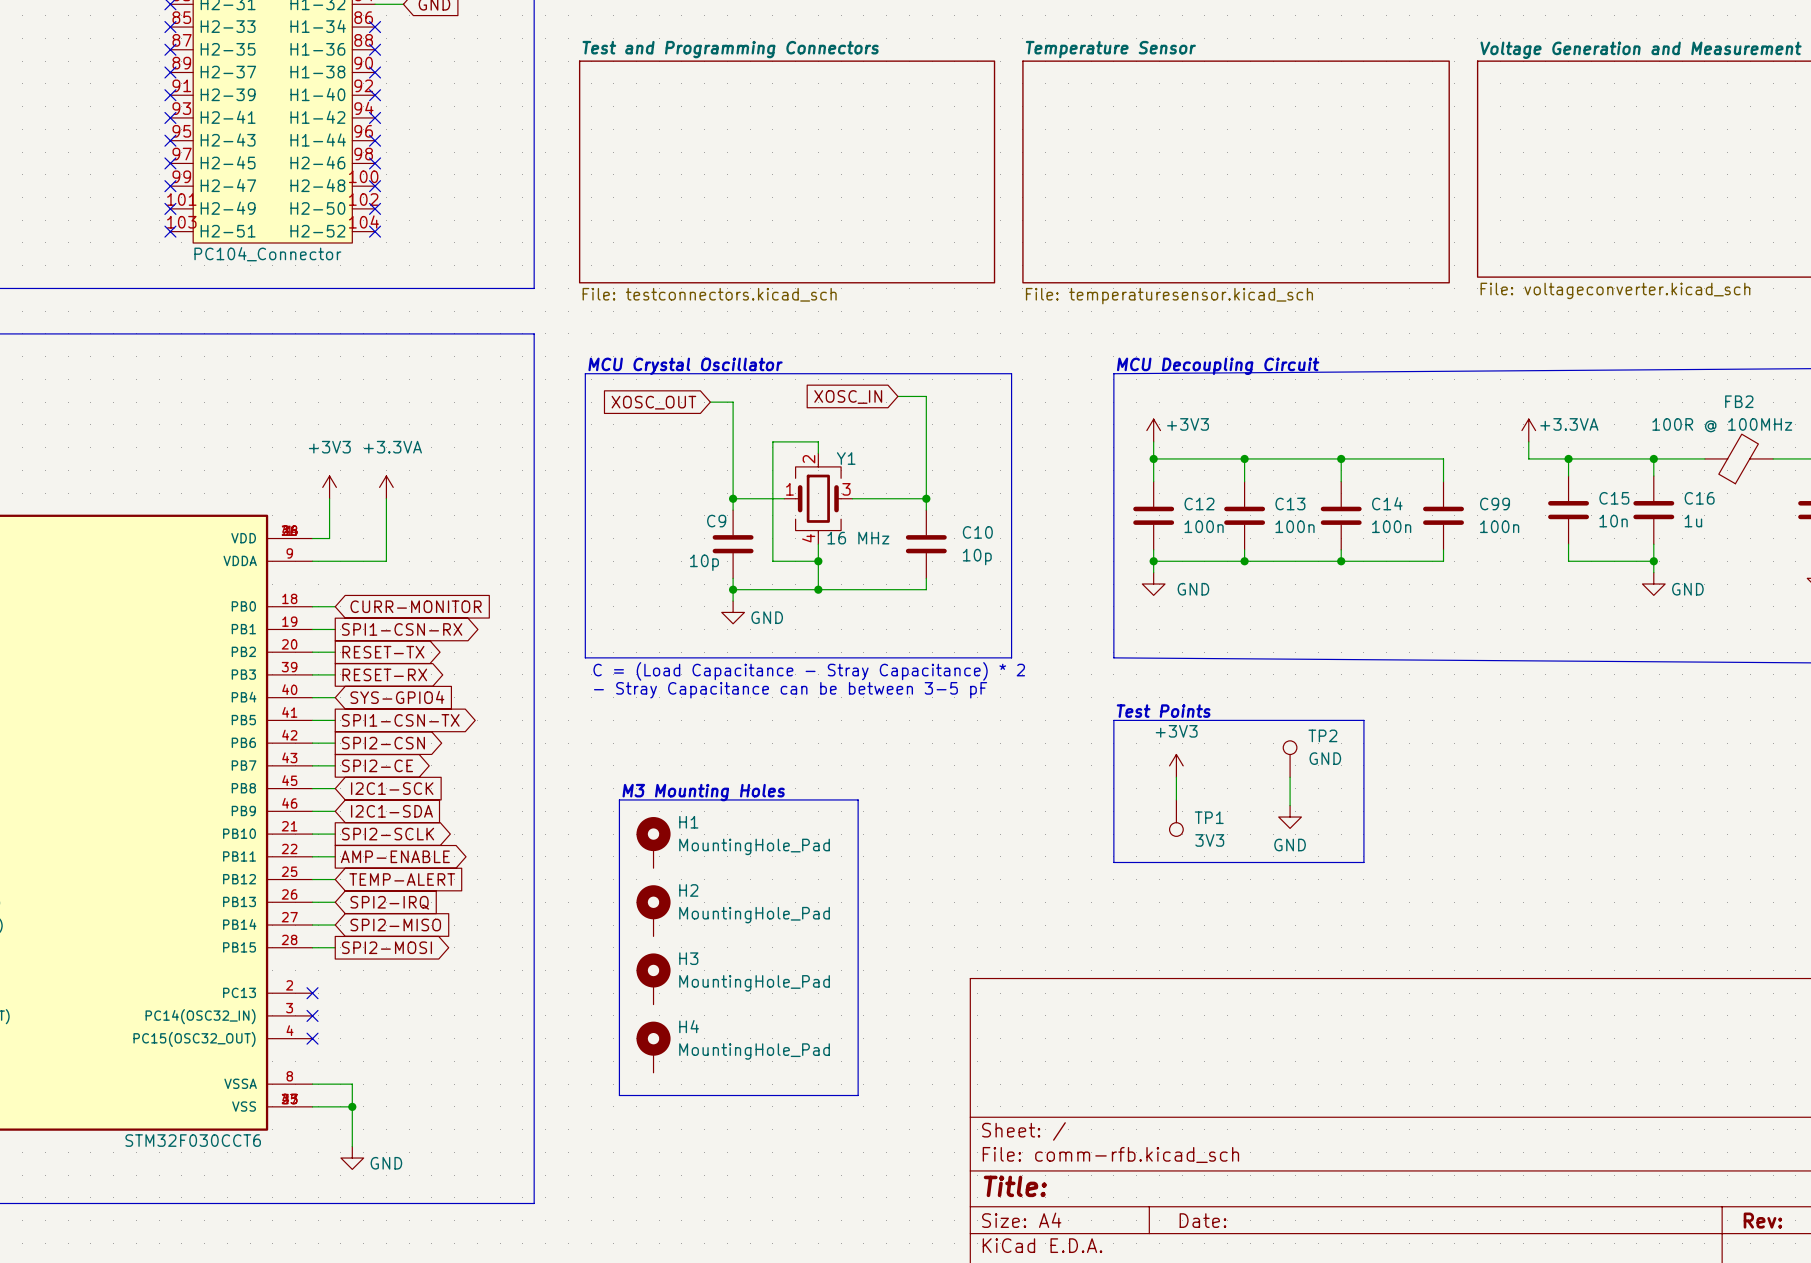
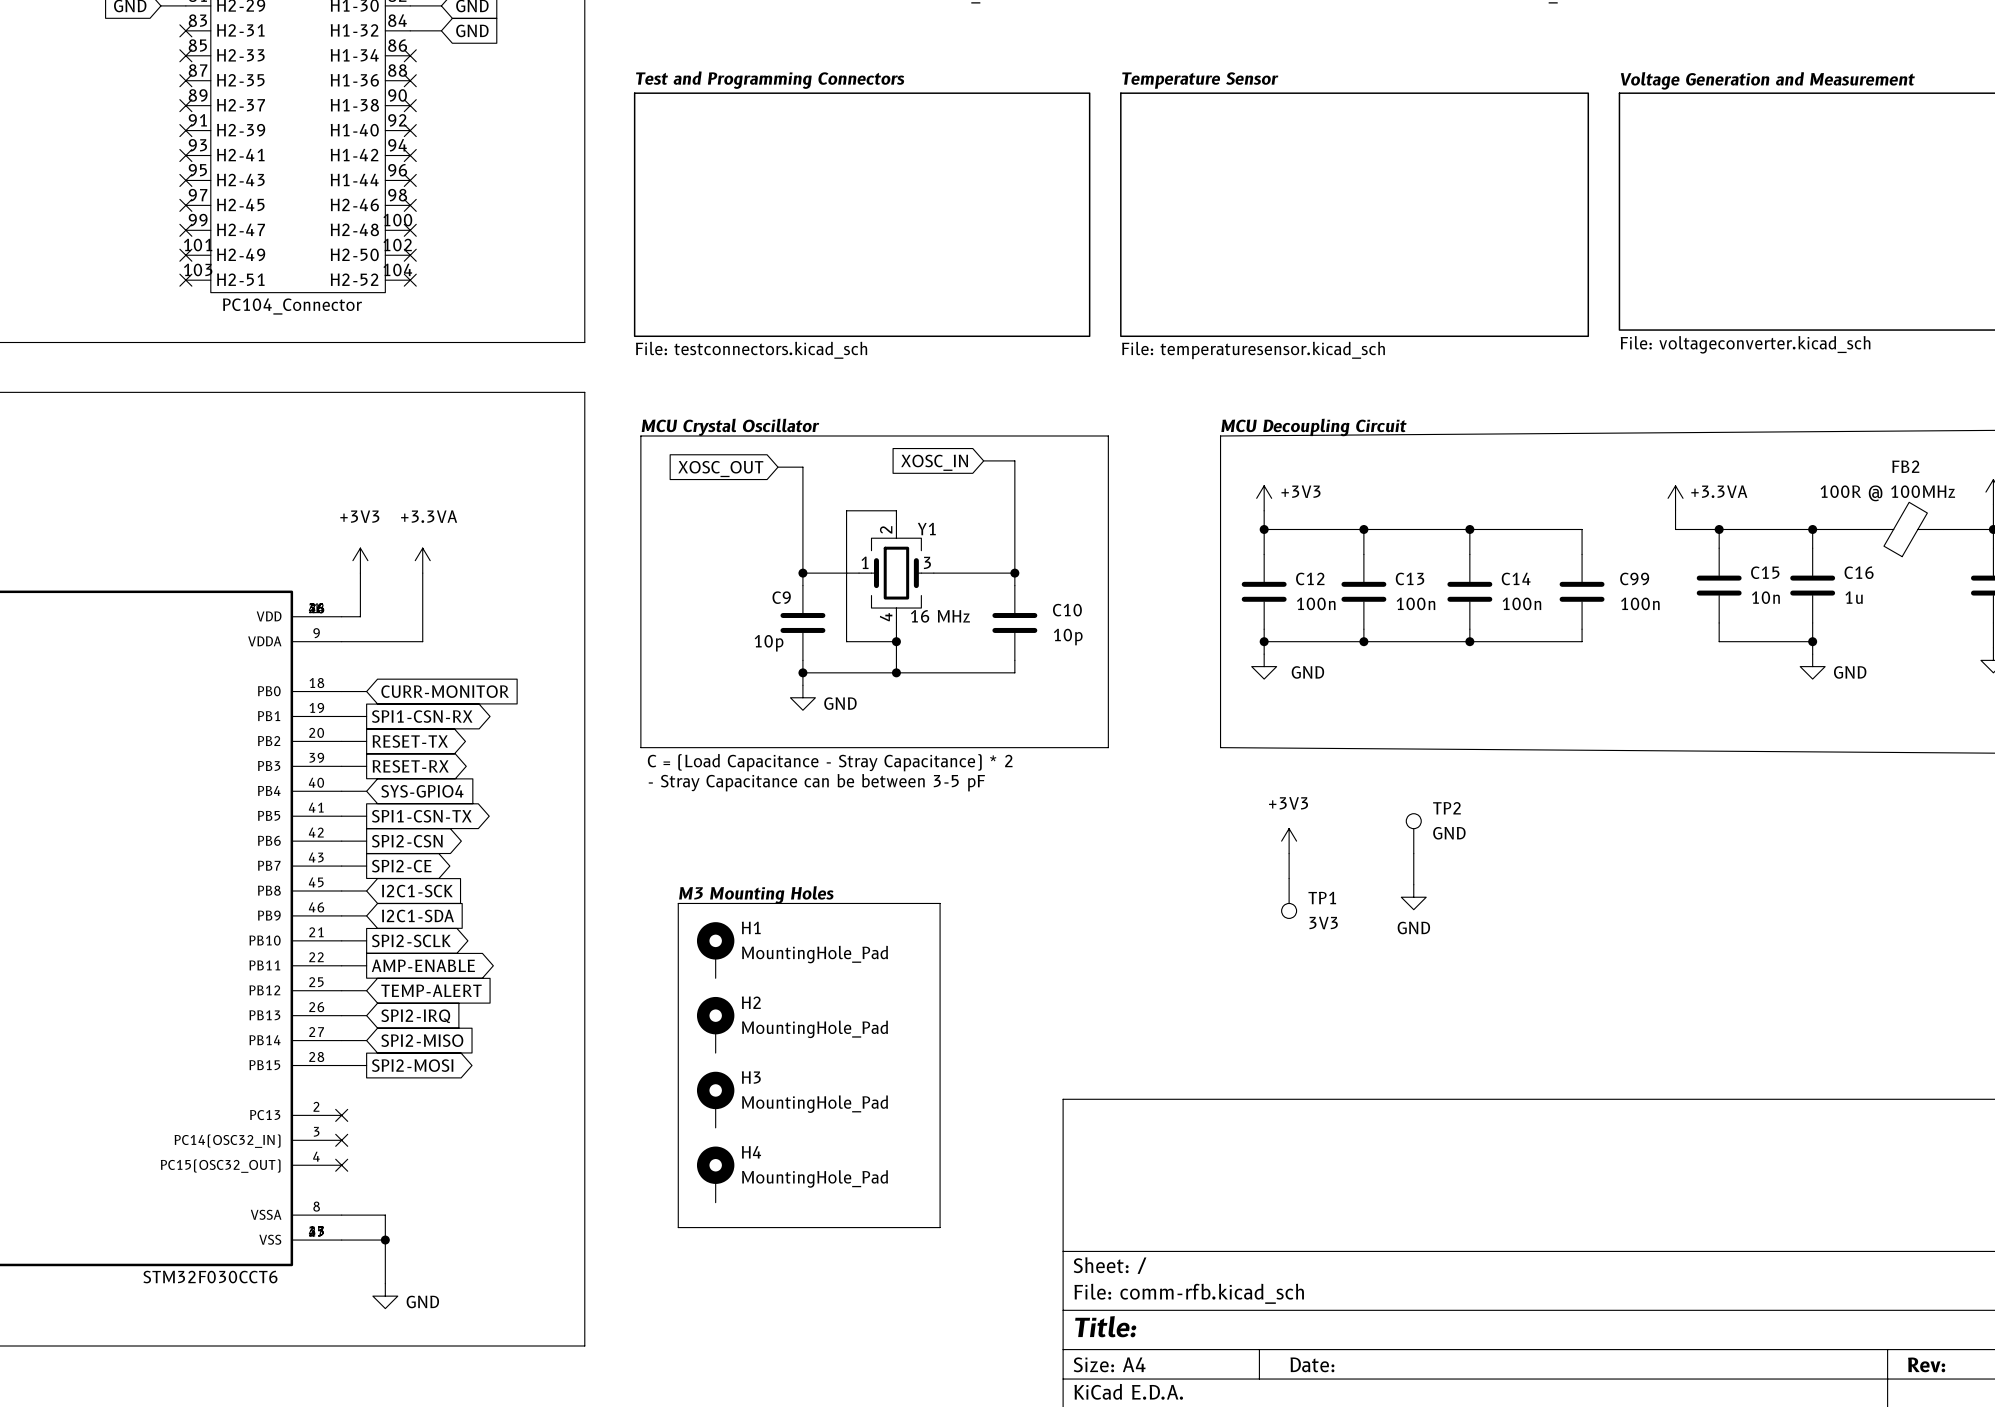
text: Test Points (1163, 711) -> none
line: (1113, 720) (1363, 720) (1363, 862) (1113, 862) (1113, 720) -> none
TP2 position: (1290, 759) -> (1413, 833)
power symbol position: +3V3 (1176, 765) -> +3V3 (1289, 841)
power symbol position: GND (1290, 817) -> GND (1413, 897)
TP1 position: (1176, 818) -> (1289, 898)

